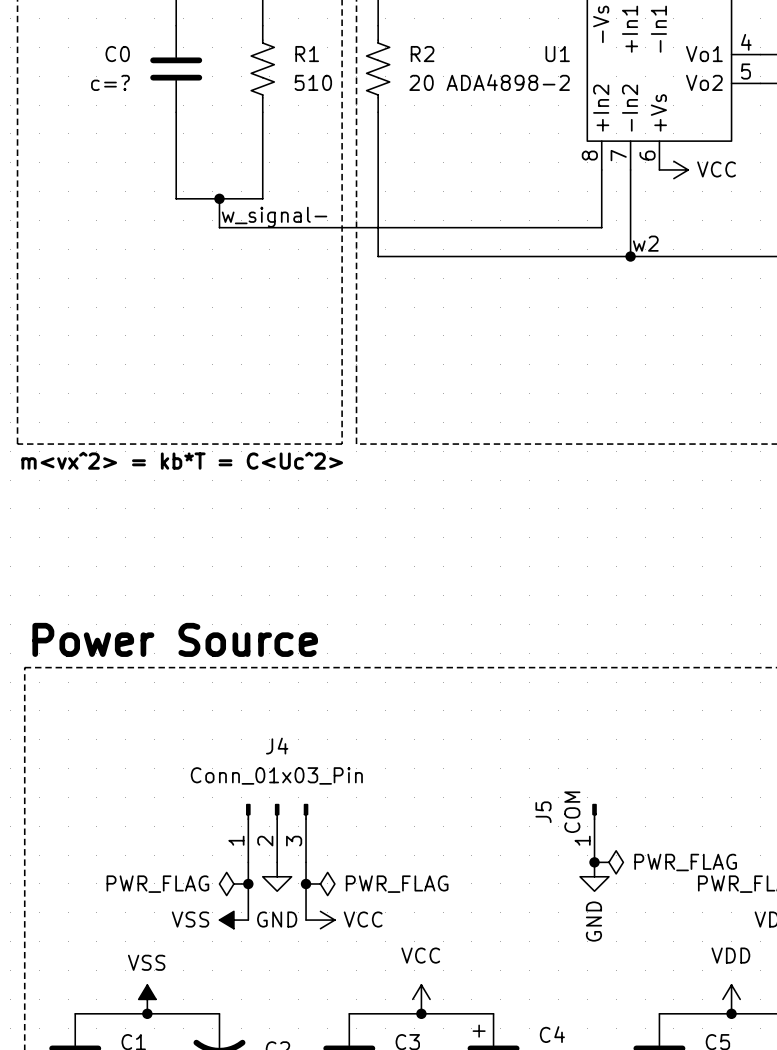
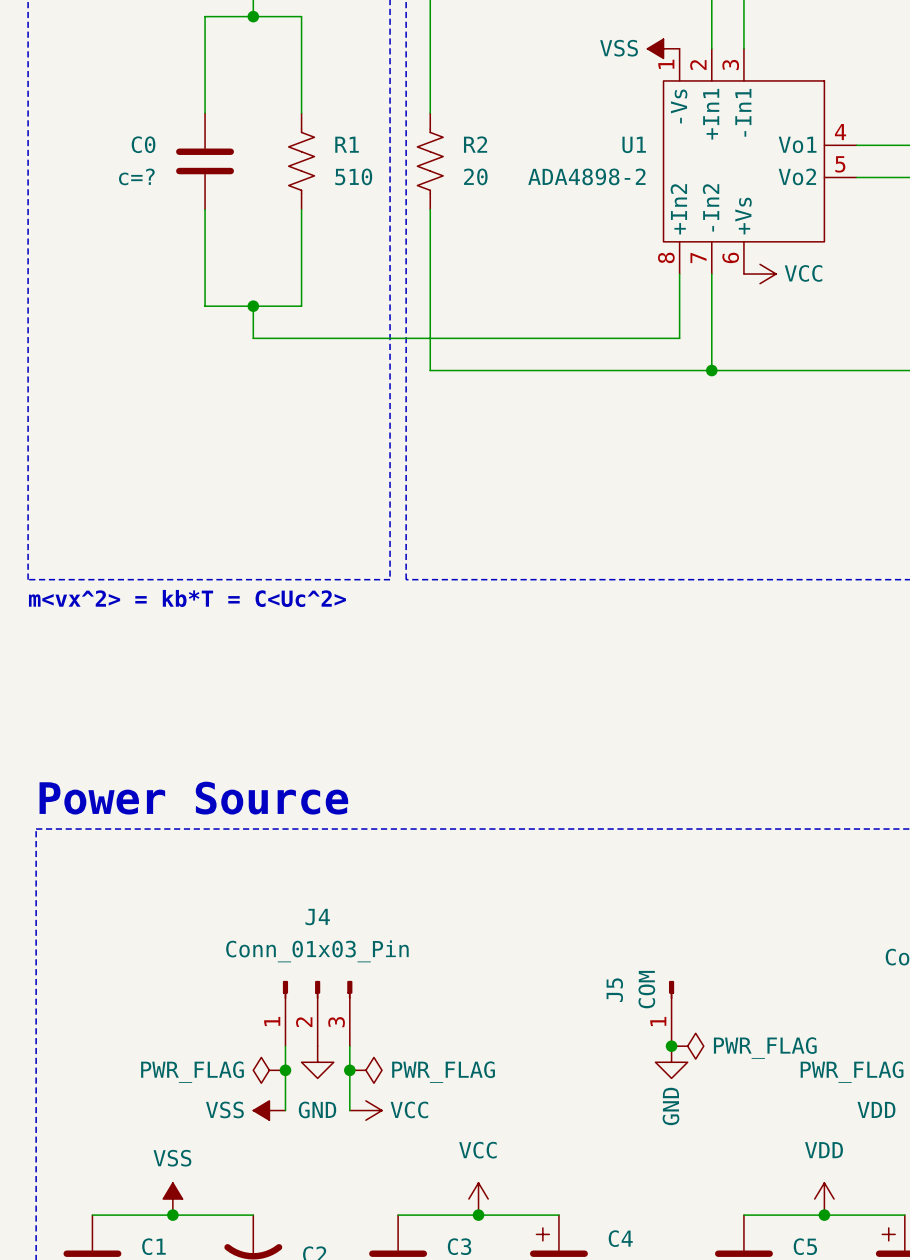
label: w_signal- (274, 217) -> none
label: w2 (645, 243) -> none

